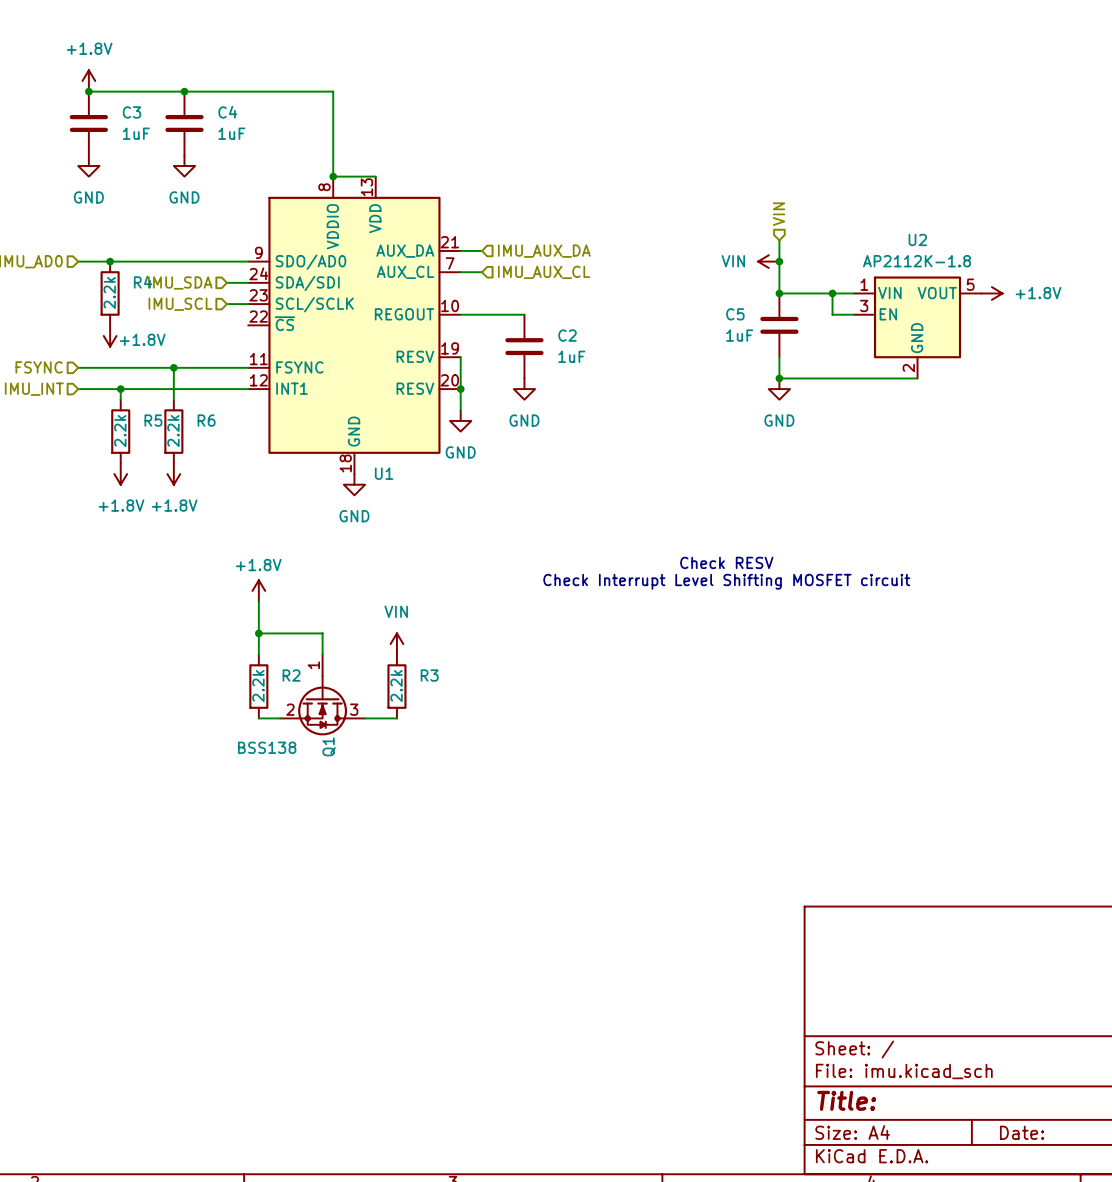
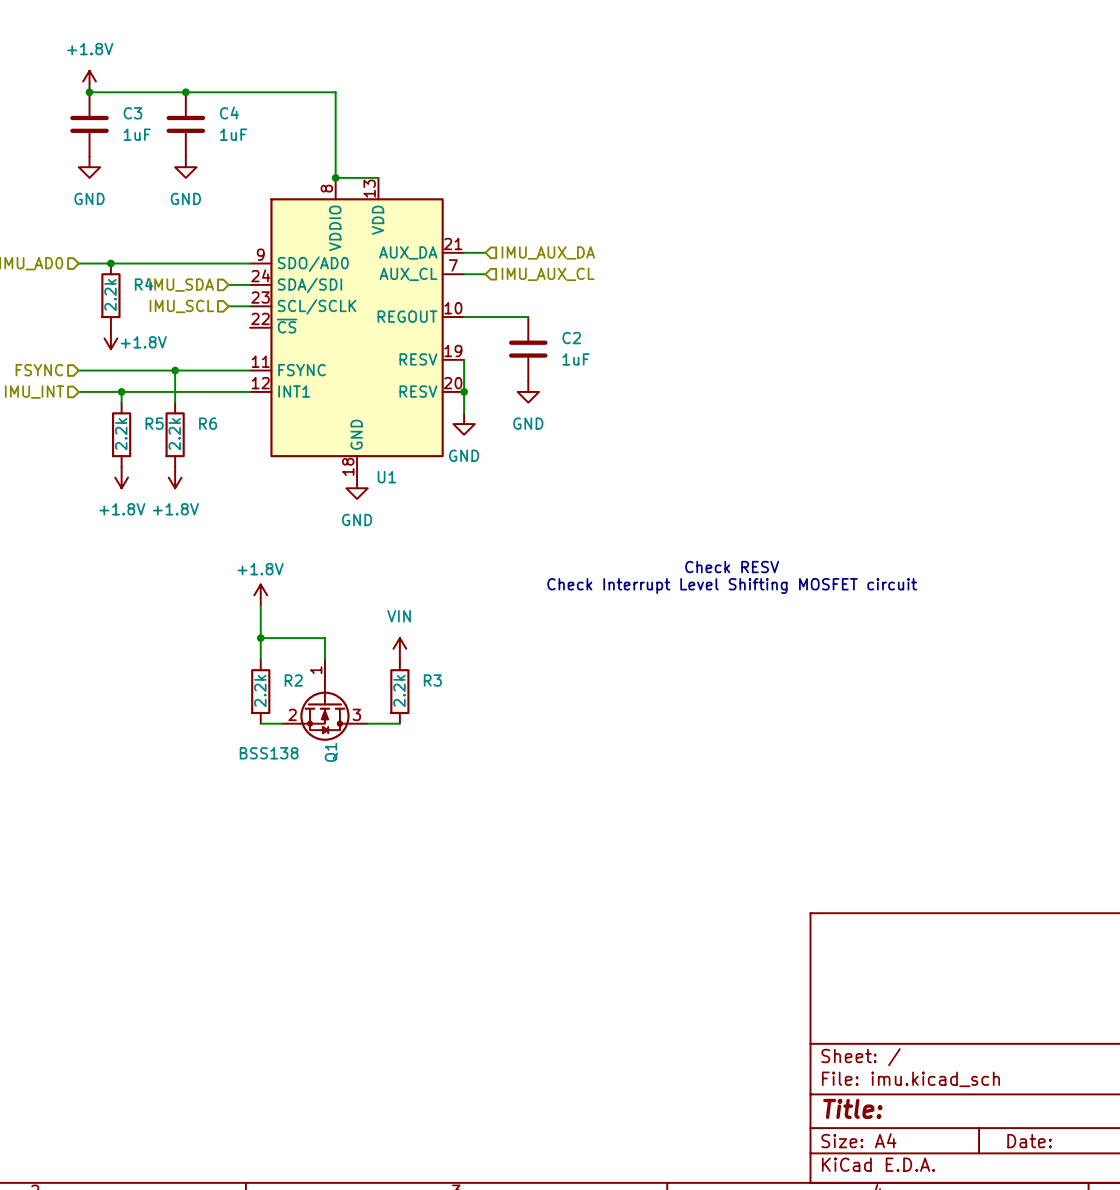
hierarchical label: VIN (779, 214) -> none
wire: (779, 240) (779, 293) (853, 293) -> none
power symbol: VIN (768, 261) -> none
junction: (779, 261) -> none
junction: (779, 293) -> none
wire: (832, 293) (832, 314) (853, 314) -> none
junction: (832, 293) -> none
power symbol: +1.8V (991, 293) -> none
C5: 1uF (779, 325) -> none
U2: AP2112K-1.8 (917, 327) -> none
wire: (779, 357) (779, 378) (917, 378) -> none
junction: (779, 378) -> none
power symbol: GND (779, 389) -> none

